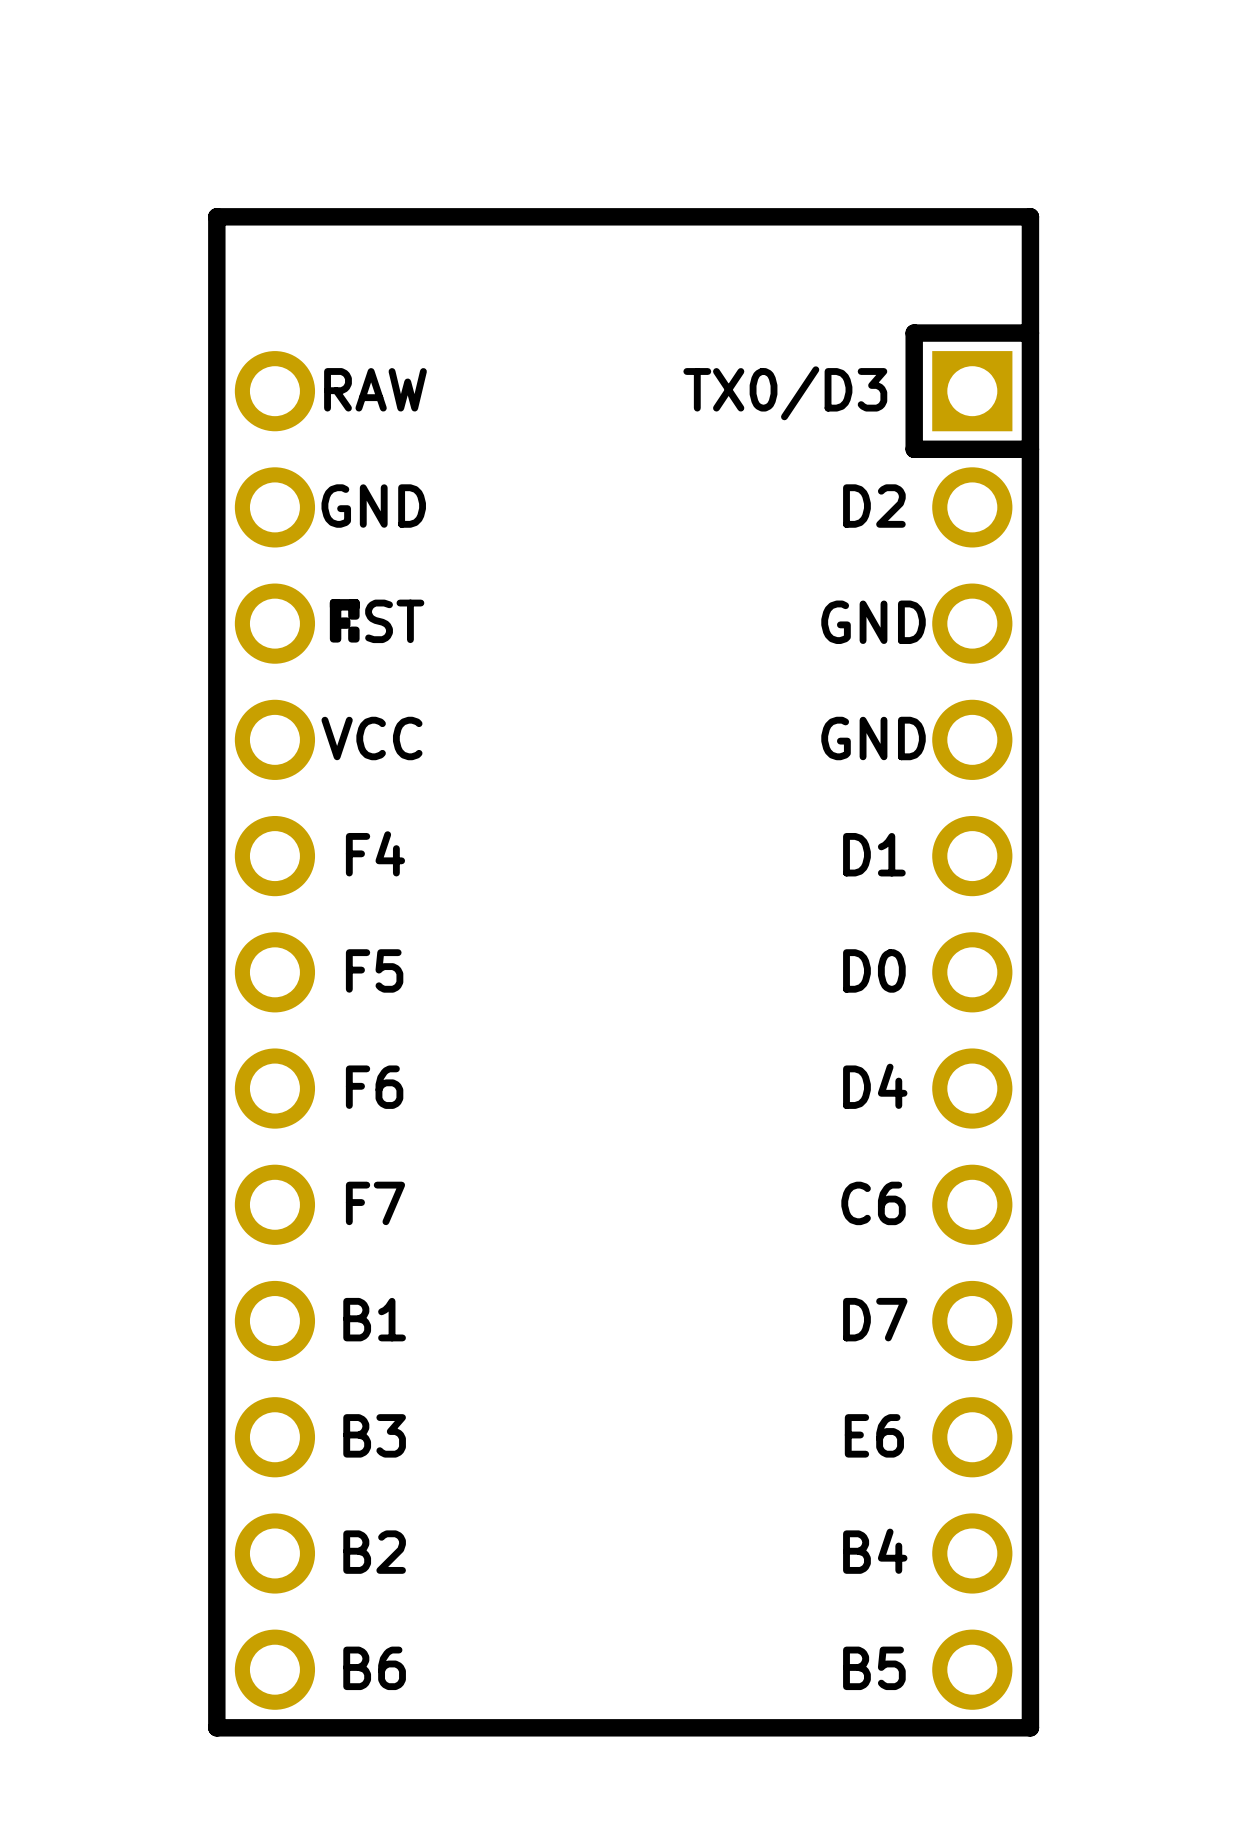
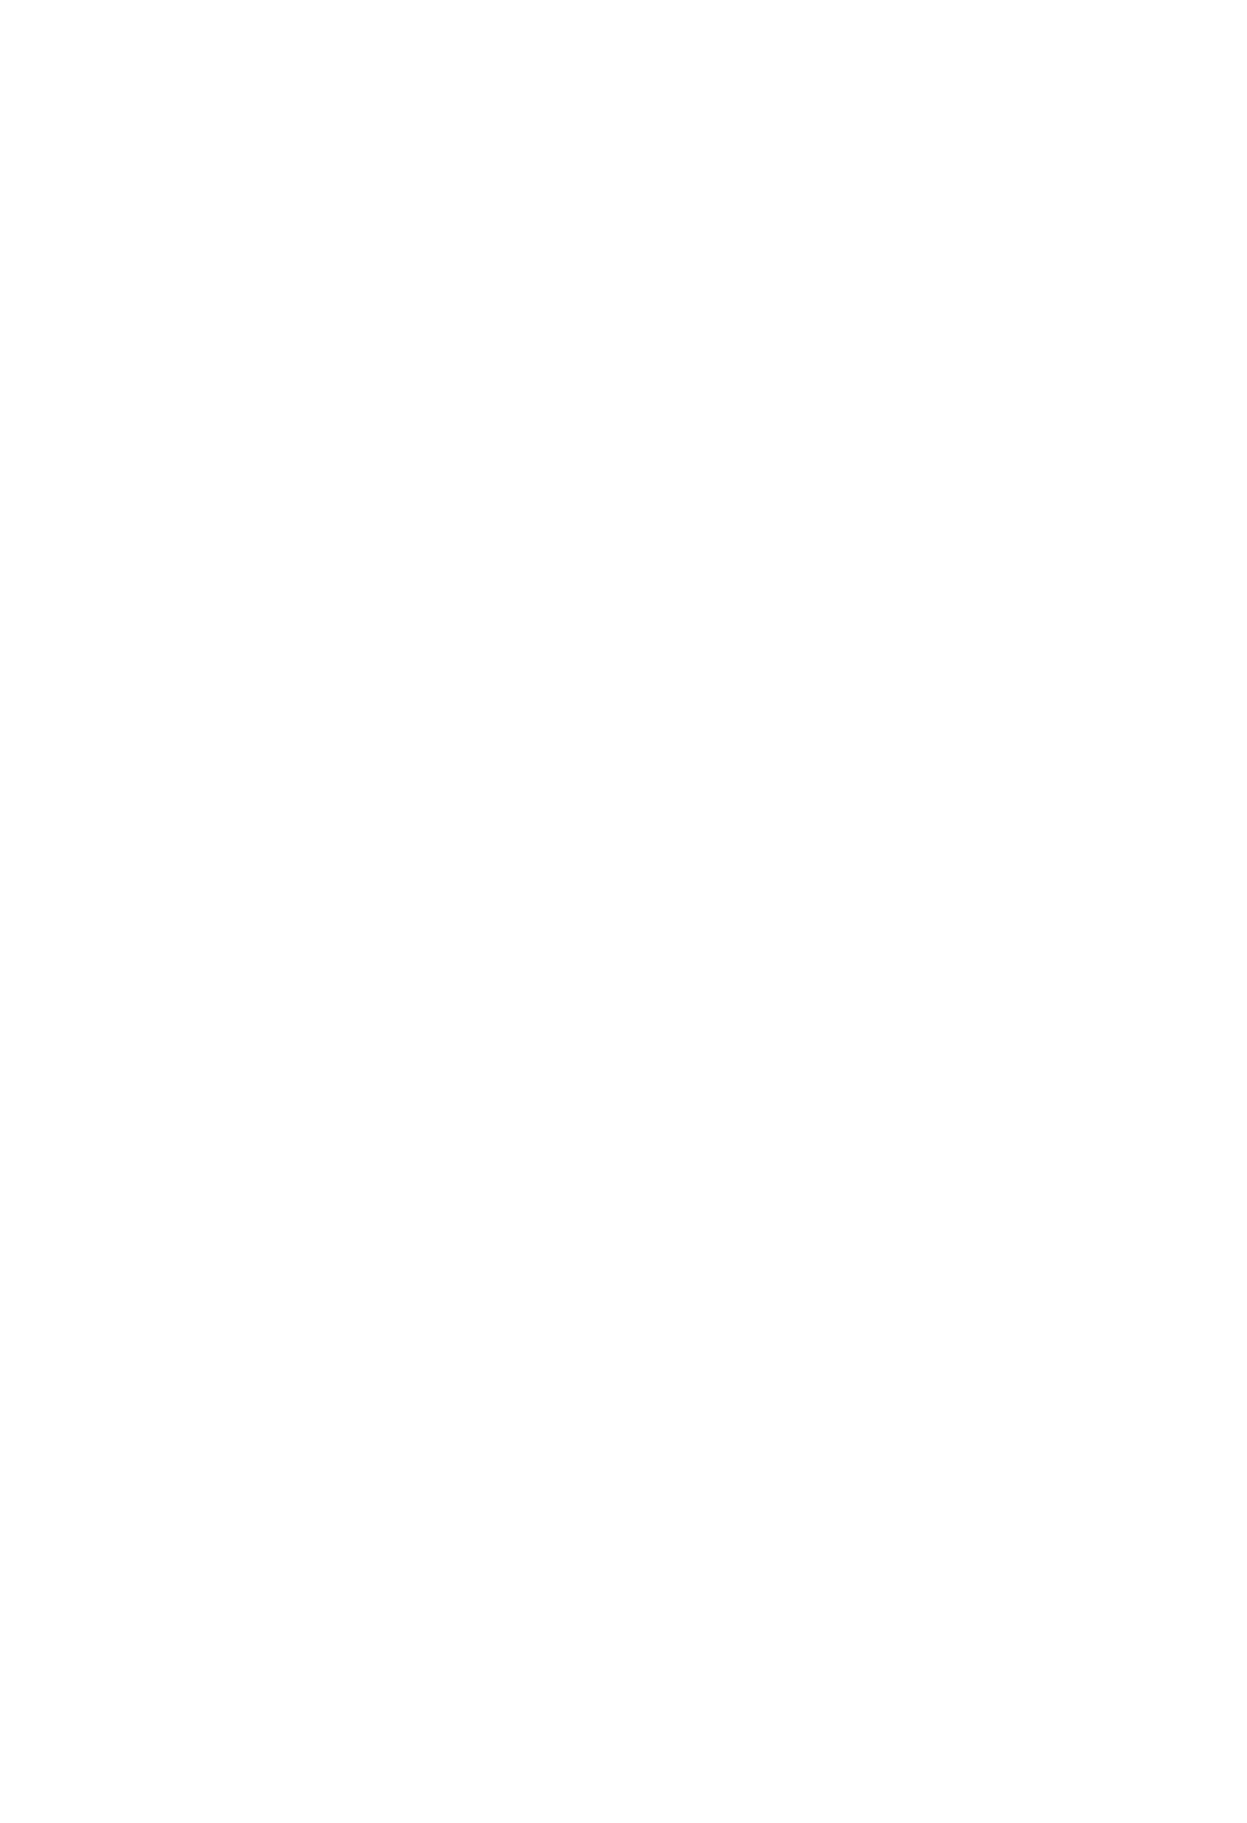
part: (623, 972) -> none

